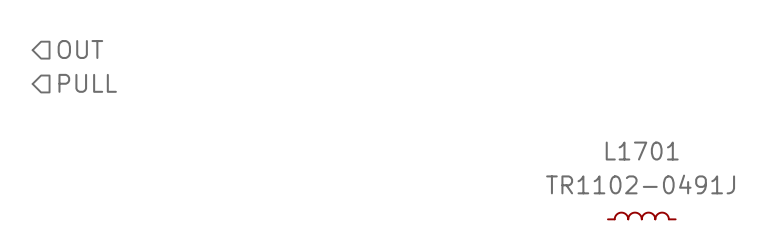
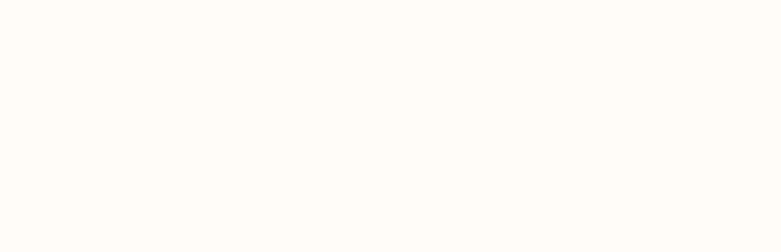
hierarchical label: OUT (80, 49) -> none
hierarchical label: PULL (87, 83) -> none
L1701: TR1102-0491J (641, 215) -> none

